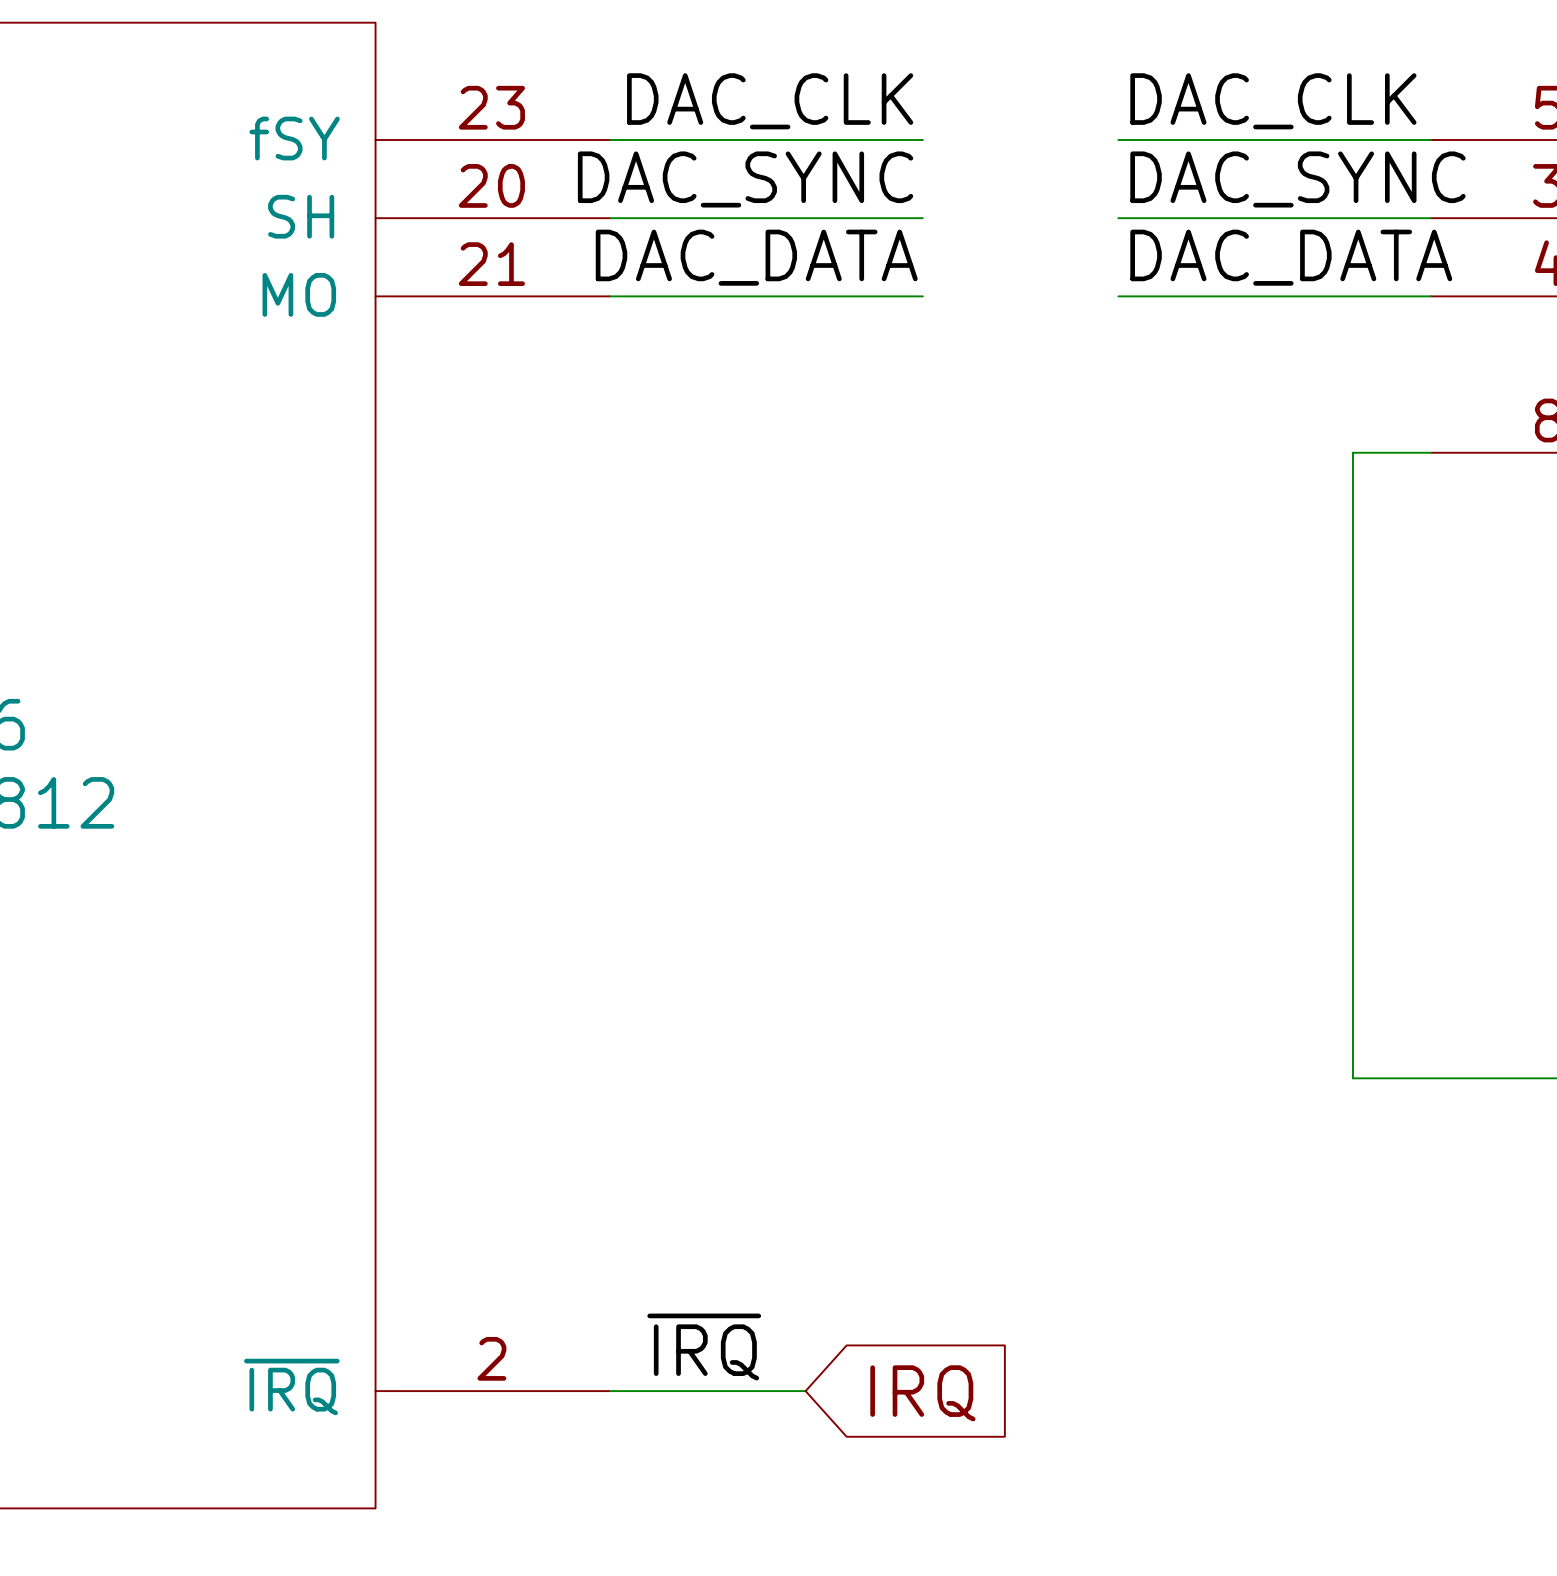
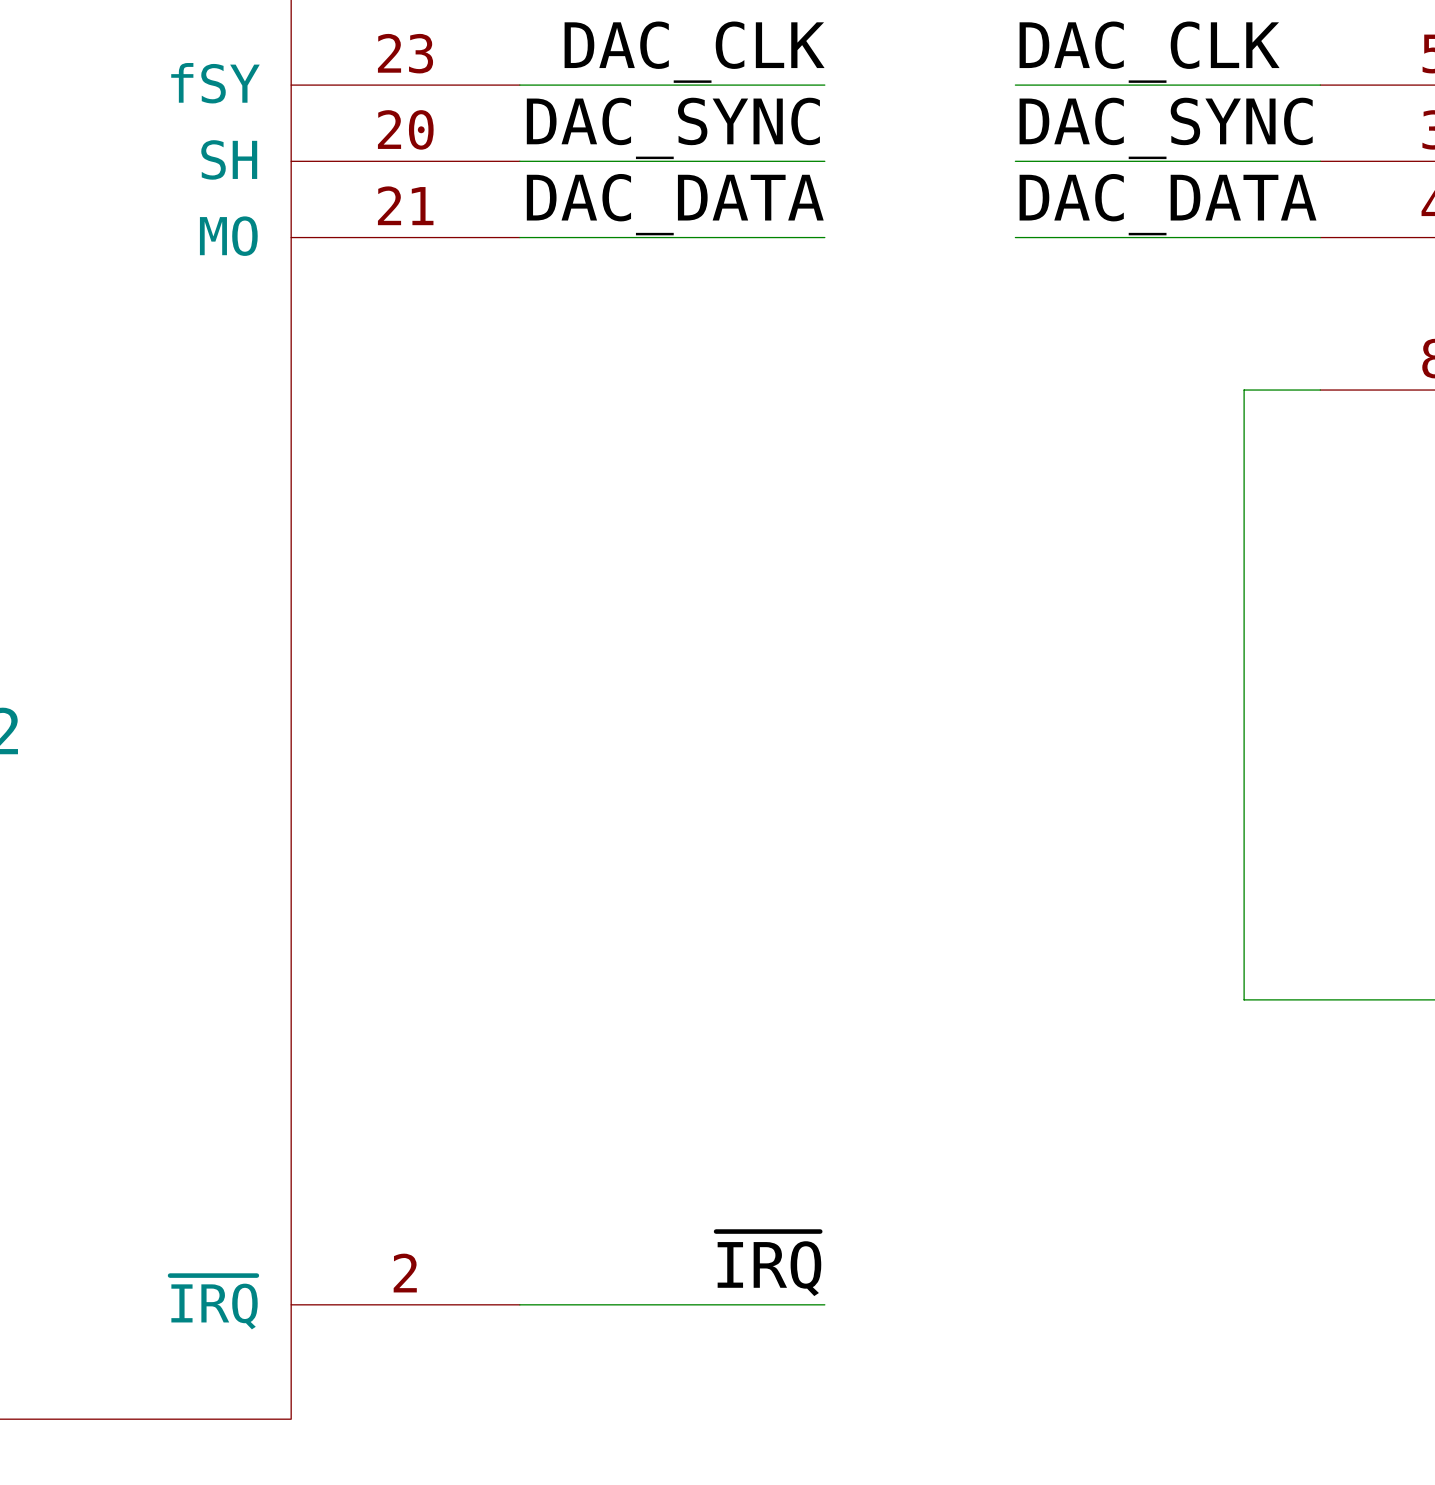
label position: ~{IRQ} (704, 1347) -> ~{IRQ} (768, 1263)
wire: none -> (710, 1304) (824, 1304)
global label: IRQ (922, 1393) -> none

